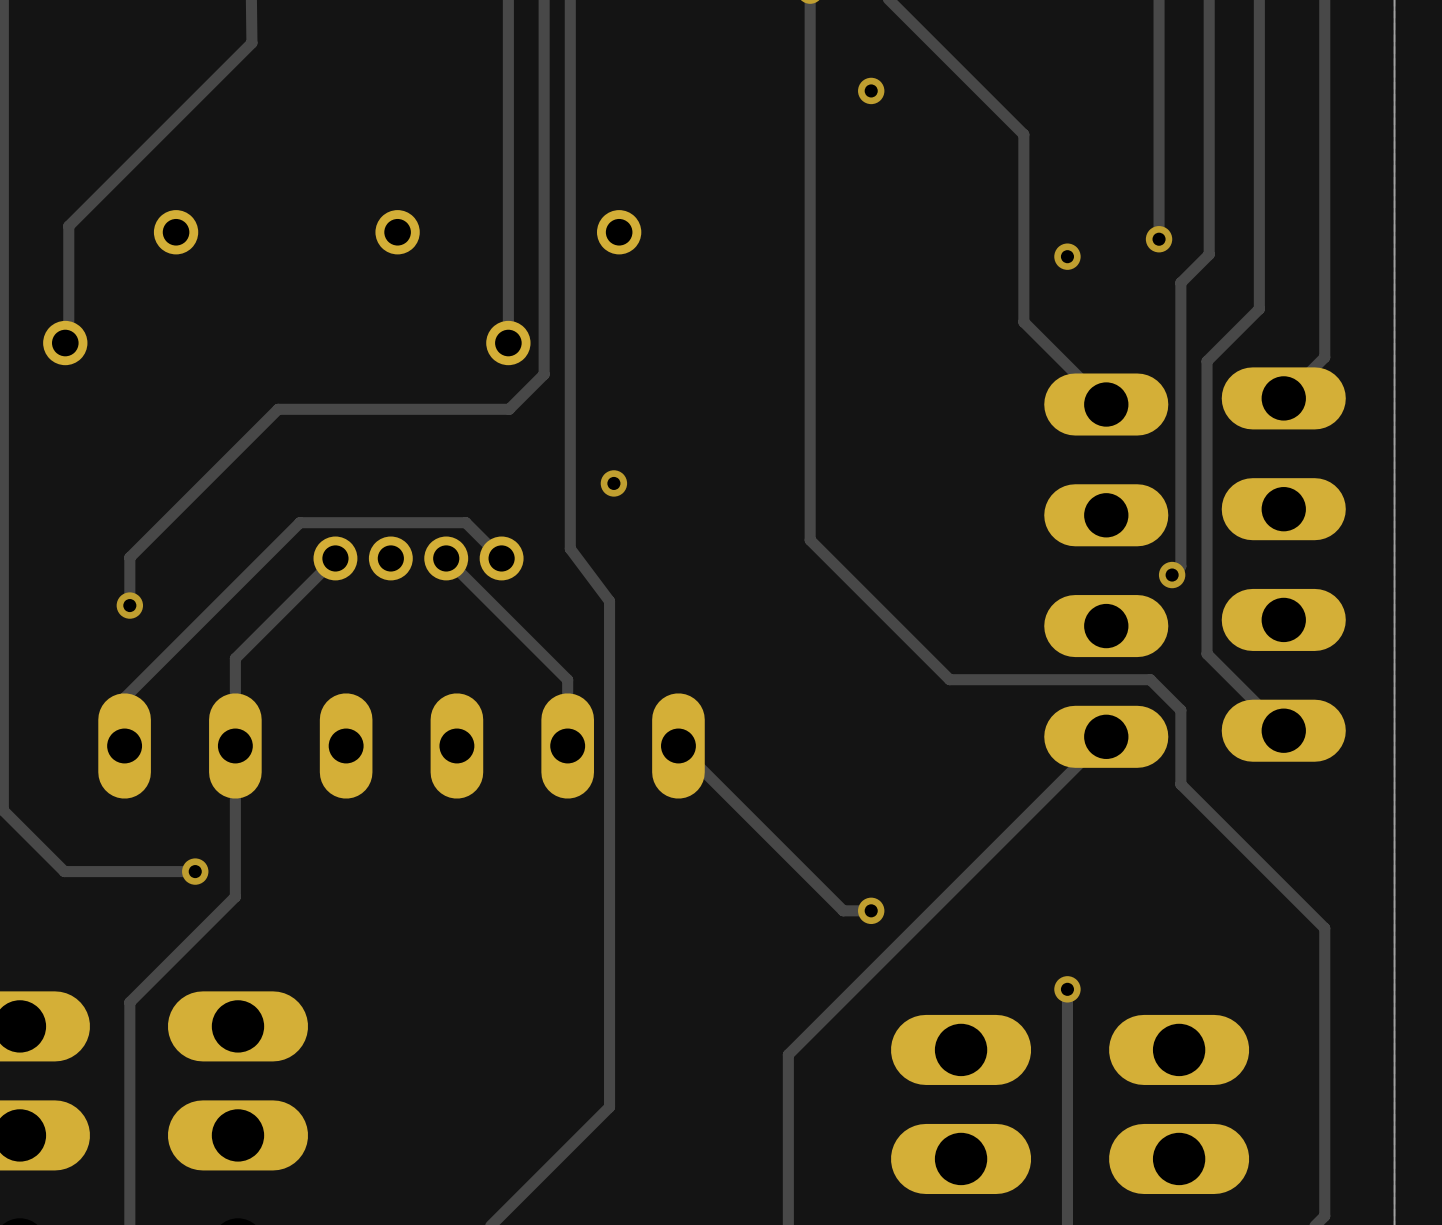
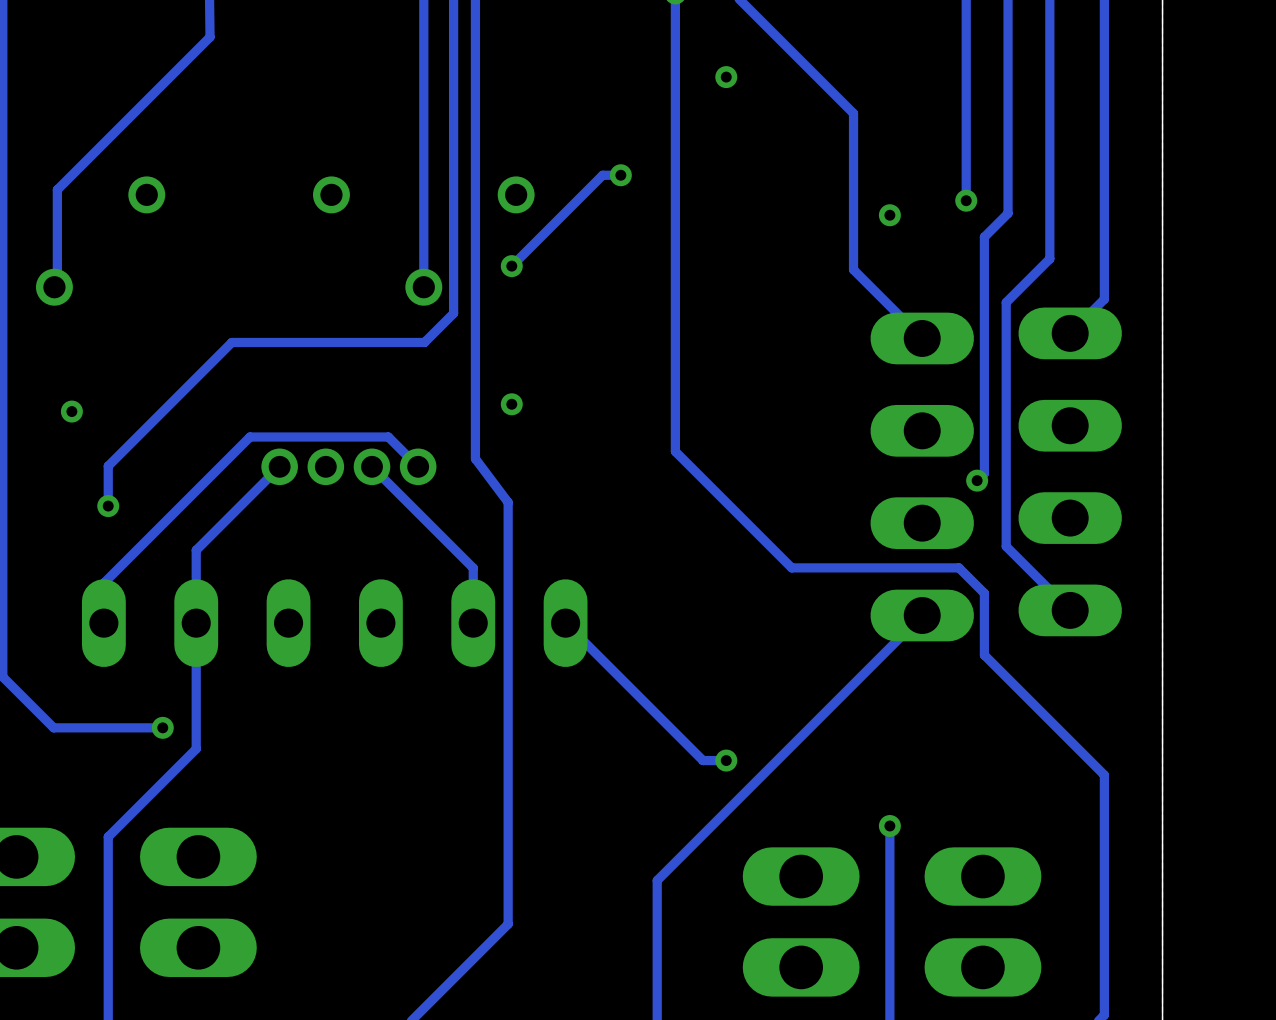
track: none -> (620, 175) (602, 175) (511, 266)
via: none -> (620, 175)
via: none -> (511, 266)
via: none -> (71, 411)

